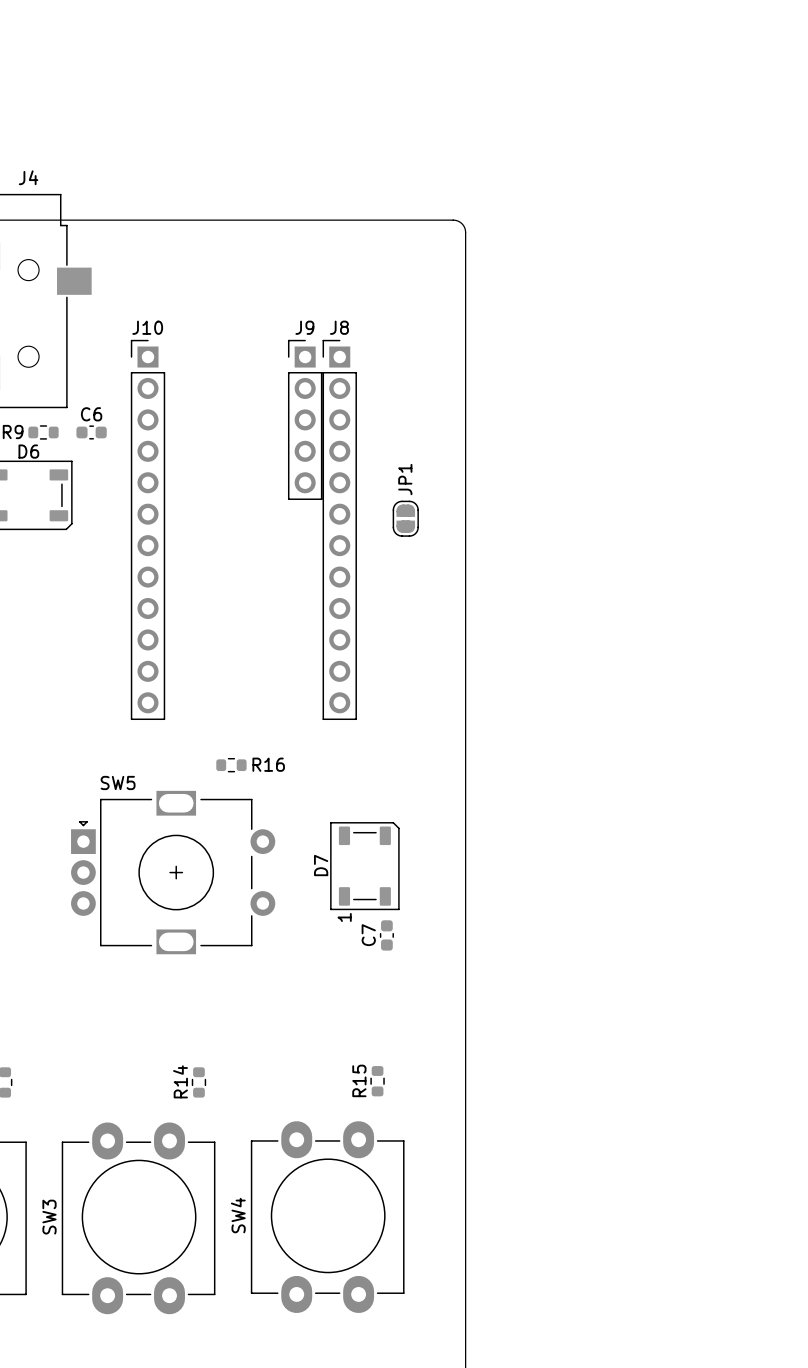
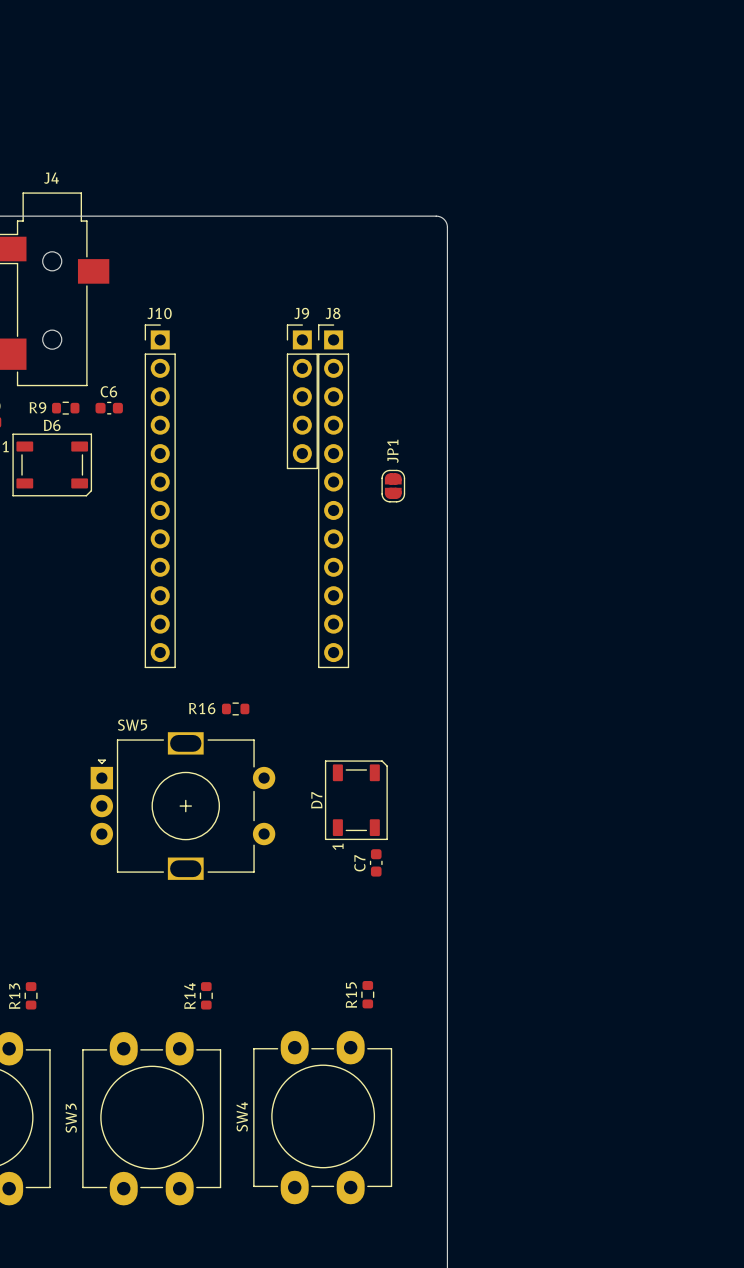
R16 name position: R16 (268, 764) -> R16 (202, 708)

